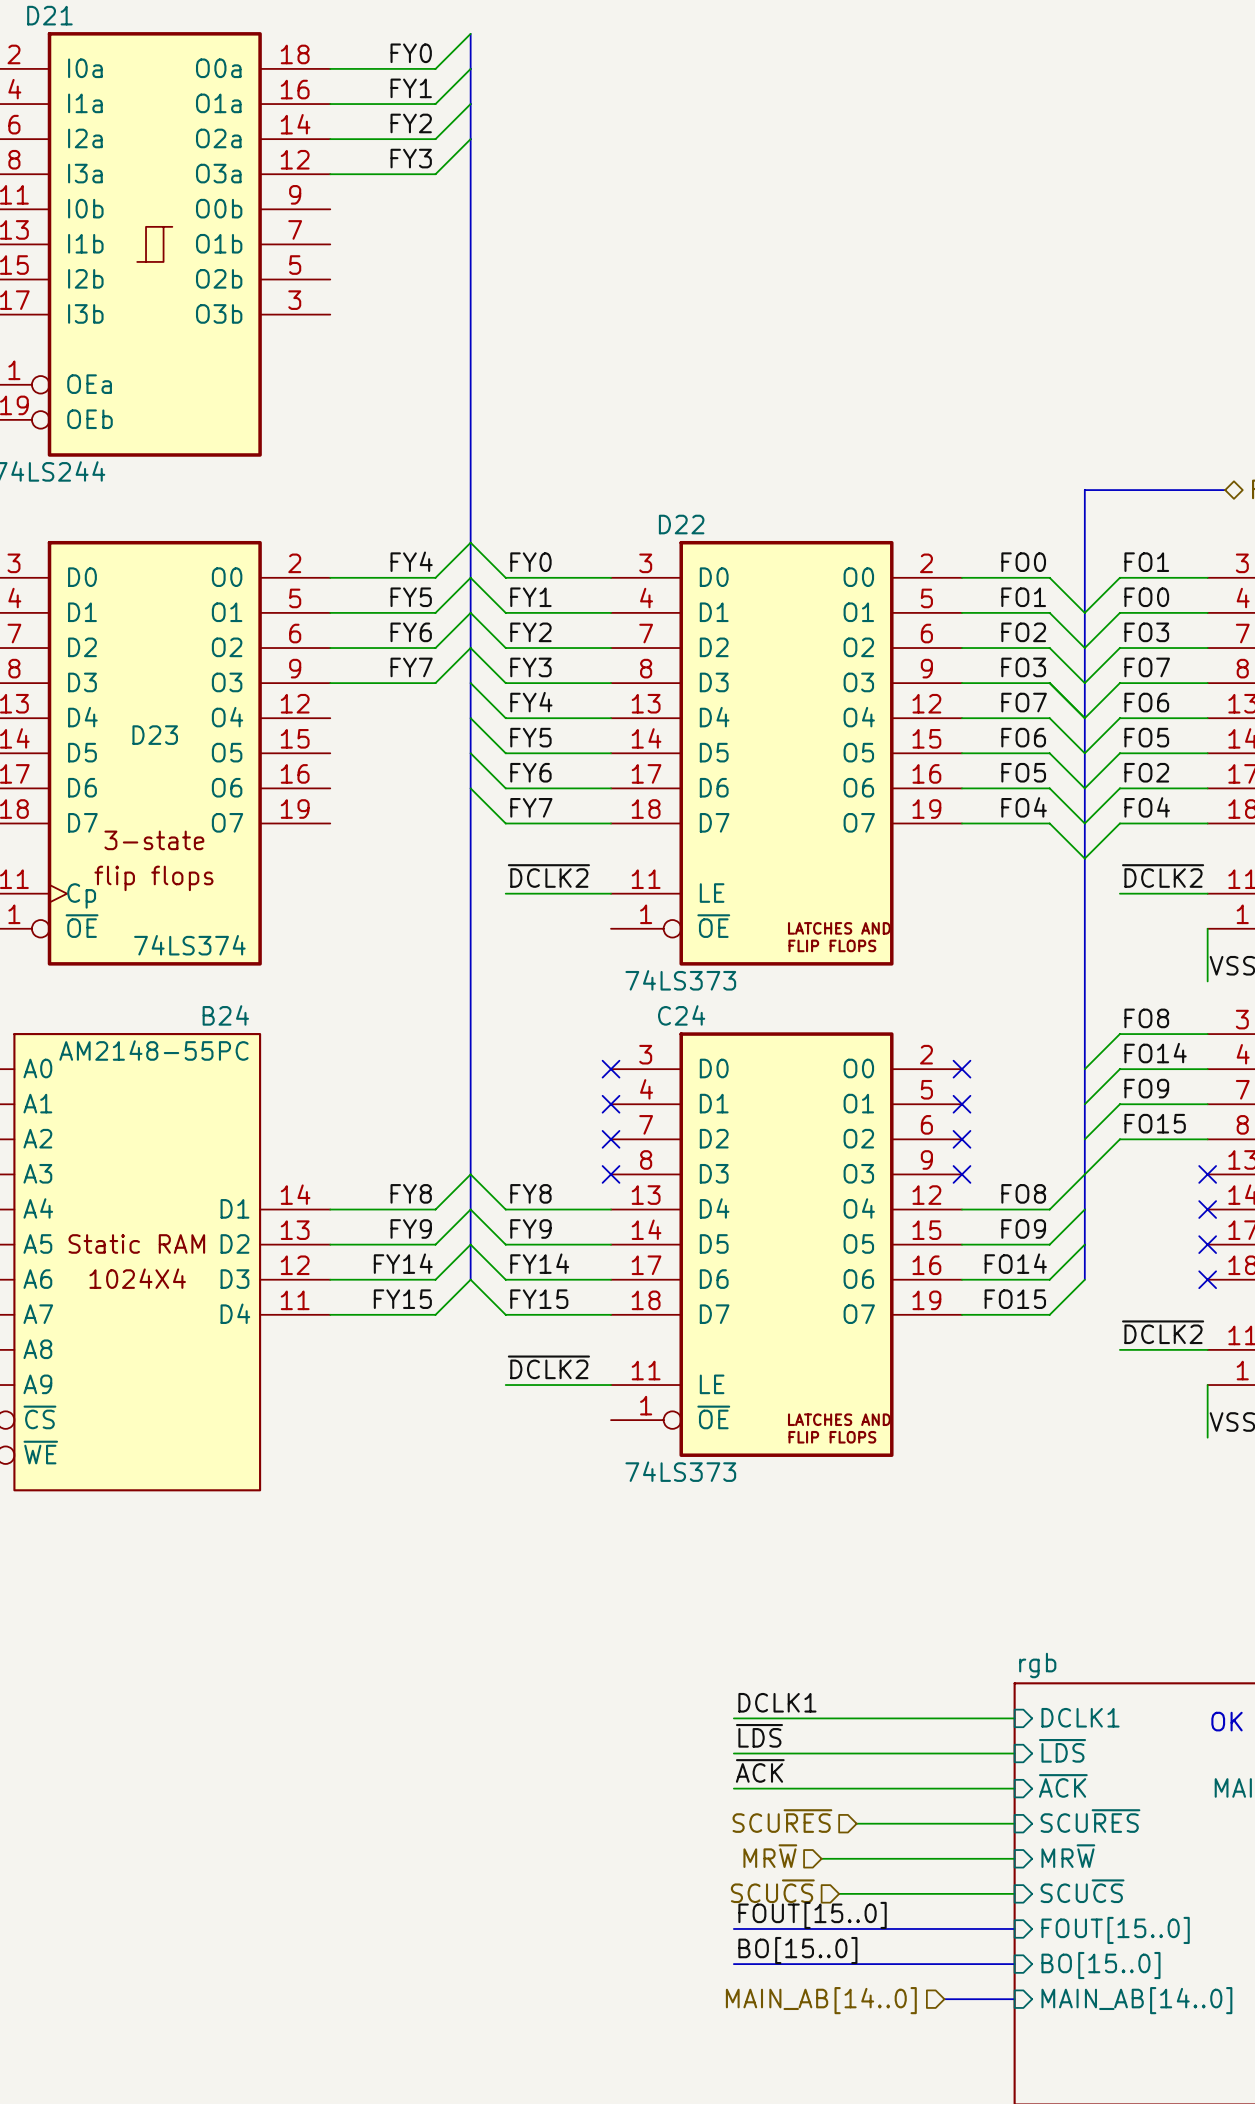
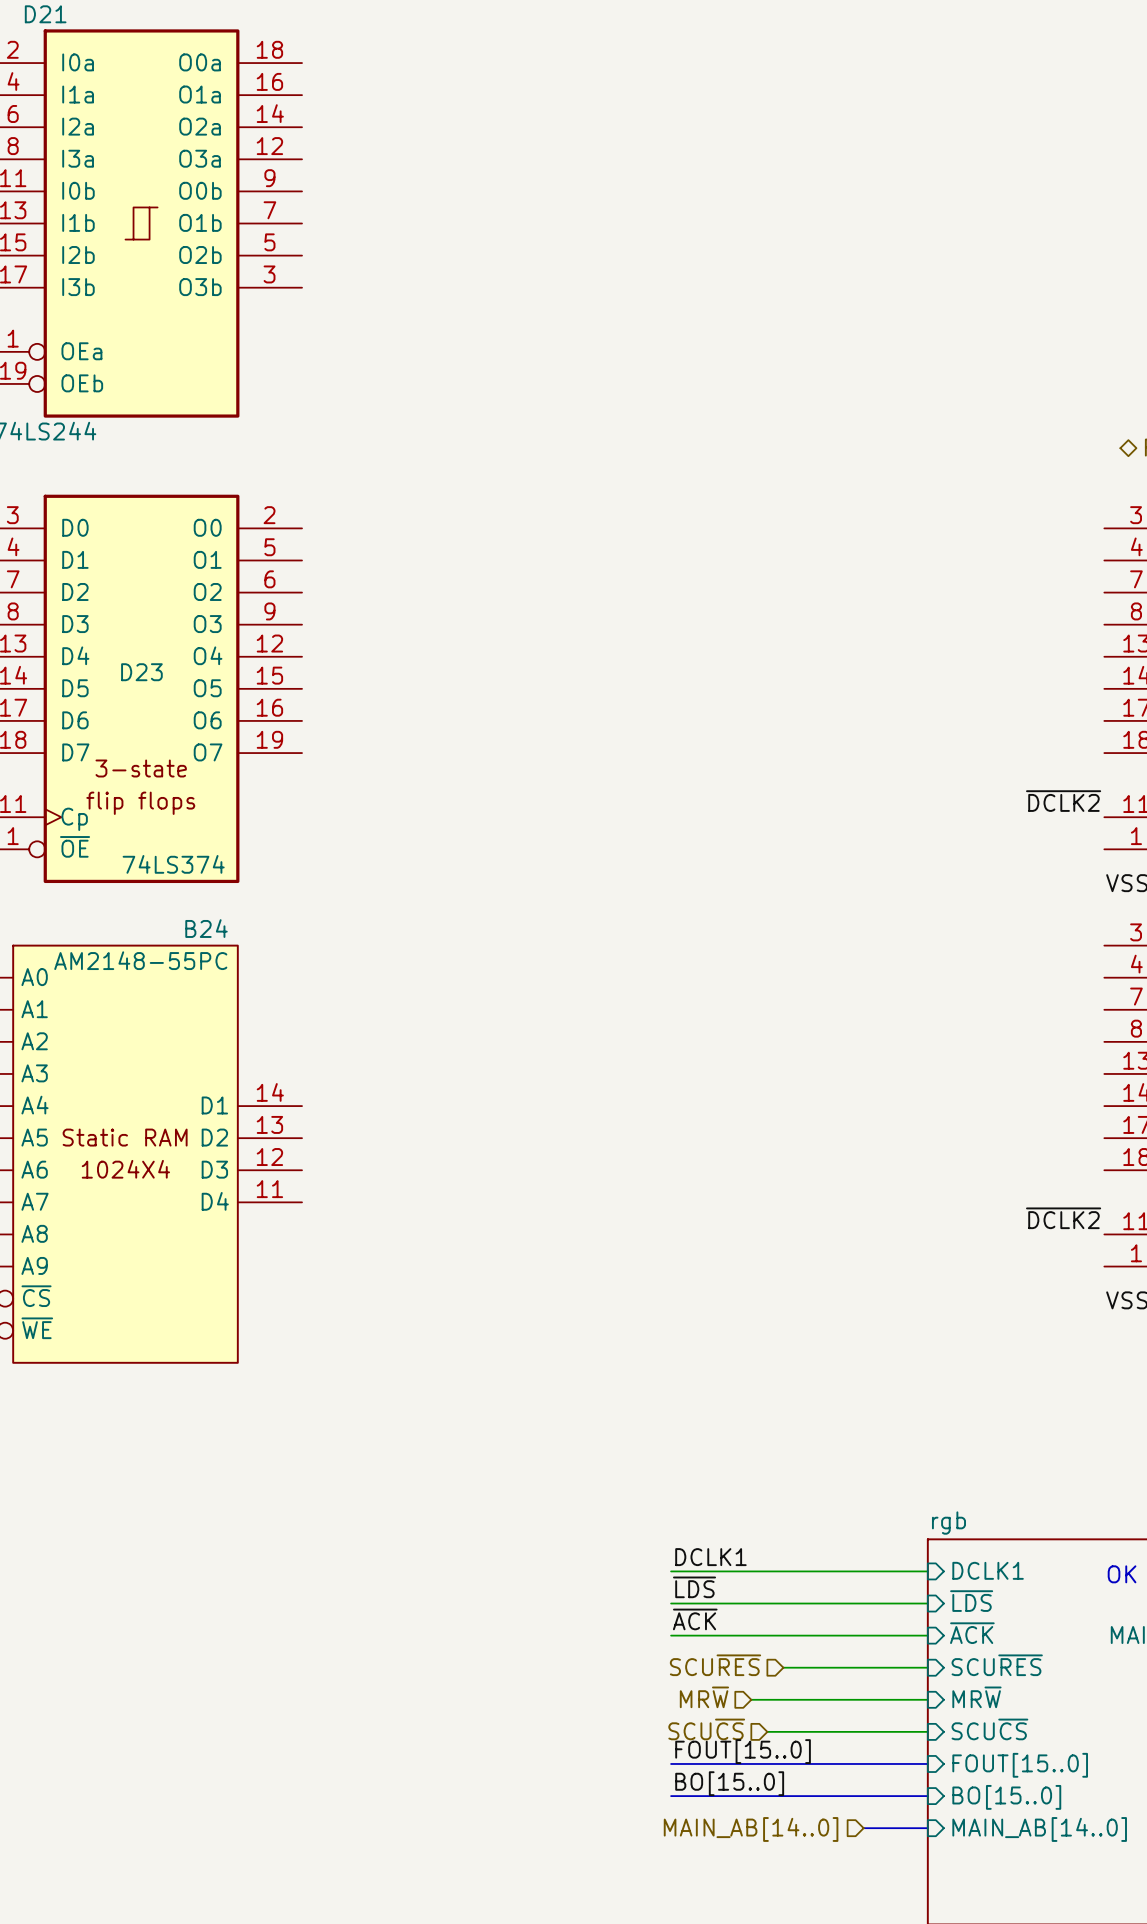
wire: (470, 33) (435, 68) (330, 68) -> none
bus: (470, 33) (470, 1279) -> none
label: FY0 (411, 53) -> none
wire: (470, 68) (435, 104) (330, 104) -> none
label: FY1 (411, 88) -> none
wire: (470, 104) (435, 139) (330, 139) -> none
label: FY2 (411, 123) -> none
wire: (470, 139) (435, 174) (330, 174) -> none
label: FY3 (411, 158) -> none
bus: (1225, 490) (1084, 490) (1084, 1279) -> none
label: FY4 (411, 561) -> none
label: FY0 (530, 562) -> none
label: FO0 (1023, 562) -> none
label: FO1 (1146, 562) -> none
wire: (330, 577) (435, 577) (470, 542) (505, 577) (611, 577) -> none
wire: (961, 577) (1049, 577) (1084, 612) (1119, 577) (1207, 577) -> none
label: FY5 (411, 597) -> none
label: FY1 (530, 597) -> none
label: FO1 (1023, 597) -> none
label: FO0 (1146, 597) -> none
wire: (330, 612) (435, 612) (470, 577) (505, 612) (611, 612) -> none
wire: (961, 612) (1049, 612) (1084, 648) (1119, 612) (1207, 612) -> none
label: FY6 (411, 632) -> none
label: FY2 (530, 632) -> none
label: FO2 (1023, 632) -> none
label: FO3 (1146, 632) -> none
wire: (330, 648) (435, 648) (470, 612) (505, 648) (611, 648) -> none
wire: (961, 648) (1049, 648) (1084, 683) (1119, 648) (1207, 648) -> none
label: FY7 (411, 667) -> none
label: FY3 (530, 667) -> none
label: FO3 (1023, 667) -> none
label: FO7 (1147, 667) -> none
wire: (330, 683) (435, 683) (470, 648) (505, 683) (611, 683) -> none
wire: (470, 683) (505, 718) (611, 718) -> none
wire: (961, 683) (1049, 683) (1084, 718) (1119, 683) (1207, 683) -> none
label: FY4 (531, 702) -> none
label: FO7 (1024, 702) -> none
label: FO6 (1146, 702) -> none
wire: (470, 718) (505, 753) (611, 753) -> none
wire: (961, 718) (1049, 718) (1084, 753) (1119, 718) (1207, 718) -> none
label: FY5 (530, 737) -> none
label: FO6 (1023, 737) -> none
label: FO5 (1146, 737) -> none
wire: (470, 753) (505, 788) (611, 788) -> none
D22: 74LS373 (786, 753) -> none
wire: (961, 753) (1049, 753) (1084, 788) (1119, 753) (1207, 753) -> none
label: FY6 (530, 772) -> none
label: FO5 (1023, 772) -> none
label: FO2 (1146, 772) -> none
wire: (470, 788) (505, 823) (611, 823) -> none
wire: (961, 788) (1049, 788) (1084, 823) (1119, 788) (1207, 788) -> none
label: FY7 (531, 807) -> none
label: FO4 (1024, 807) -> none
label: FO4 (1147, 807) -> none
wire: (961, 823) (1049, 823) (1084, 858) (1119, 823) (1207, 823) -> none
label: ~{DCLK2} (548, 876) -> none
wire: (505, 893) (611, 893) -> none
wire: (1119, 893) (1207, 893) -> none
wire: (1207, 928) (1207, 981) -> none
label: FO8 (1146, 1018) -> none
wire: (1207, 1034) (1119, 1034) (1084, 1069) -> none
label: FO14 (1155, 1053) -> none
no-connect mark: (611, 1069) -> none
no-connect mark: (961, 1069) -> none
wire: (1207, 1069) (1119, 1069) (1084, 1104) -> none
label: FO9 (1146, 1088) -> none
no-connect mark: (611, 1104) -> none
no-connect mark: (961, 1104) -> none
wire: (1207, 1104) (1119, 1104) (1084, 1139) -> none
label: FO15 (1155, 1123) -> none
no-connect mark: (611, 1139) -> none
no-connect mark: (961, 1139) -> none
wire: (1207, 1139) (1119, 1139) (1049, 1209) (961, 1209) -> none
no-connect mark: (611, 1174) -> none
no-connect mark: (961, 1174) -> none
no-connect mark: (1207, 1174) -> none
label: FY8 (411, 1193) -> none
label: FY8 (530, 1193) -> none
label: FO8 (1023, 1193) -> none
wire: (330, 1209) (435, 1209) (470, 1174) (505, 1209) (611, 1209) -> none
wire: (1084, 1209) (1049, 1244) (961, 1244) -> none
no-connect mark: (1207, 1209) -> none
label: FY9 (411, 1228) -> none
label: FY9 (530, 1228) -> none
label: FO9 (1023, 1228) -> none
wire: (330, 1244) (435, 1244) (470, 1209) (505, 1244) (611, 1244) -> none
C24: 74LS373 (786, 1244) -> none
wire: (1084, 1244) (1049, 1279) (961, 1279) -> none
no-connect mark: (1207, 1244) -> none
label: FY14 (403, 1263) -> none
label: FY14 (539, 1263) -> none
label: FO14 (1015, 1263) -> none
wire: (330, 1279) (435, 1279) (470, 1244) (505, 1279) (611, 1279) -> none
wire: (1084, 1279) (1049, 1314) (961, 1314) -> none
no-connect mark: (1207, 1279) -> none
label: FY15 (402, 1299) -> none
label: FY15 (539, 1299) -> none
label: FO15 (1015, 1299) -> none
wire: (330, 1314) (435, 1314) (470, 1279) (505, 1314) (611, 1314) -> none
wire: (1119, 1349) (1207, 1349) -> none
label: ~{DCLK2} (548, 1367) -> none
wire: (505, 1385) (611, 1385) -> none
wire: (1207, 1385) (1207, 1437) -> none

